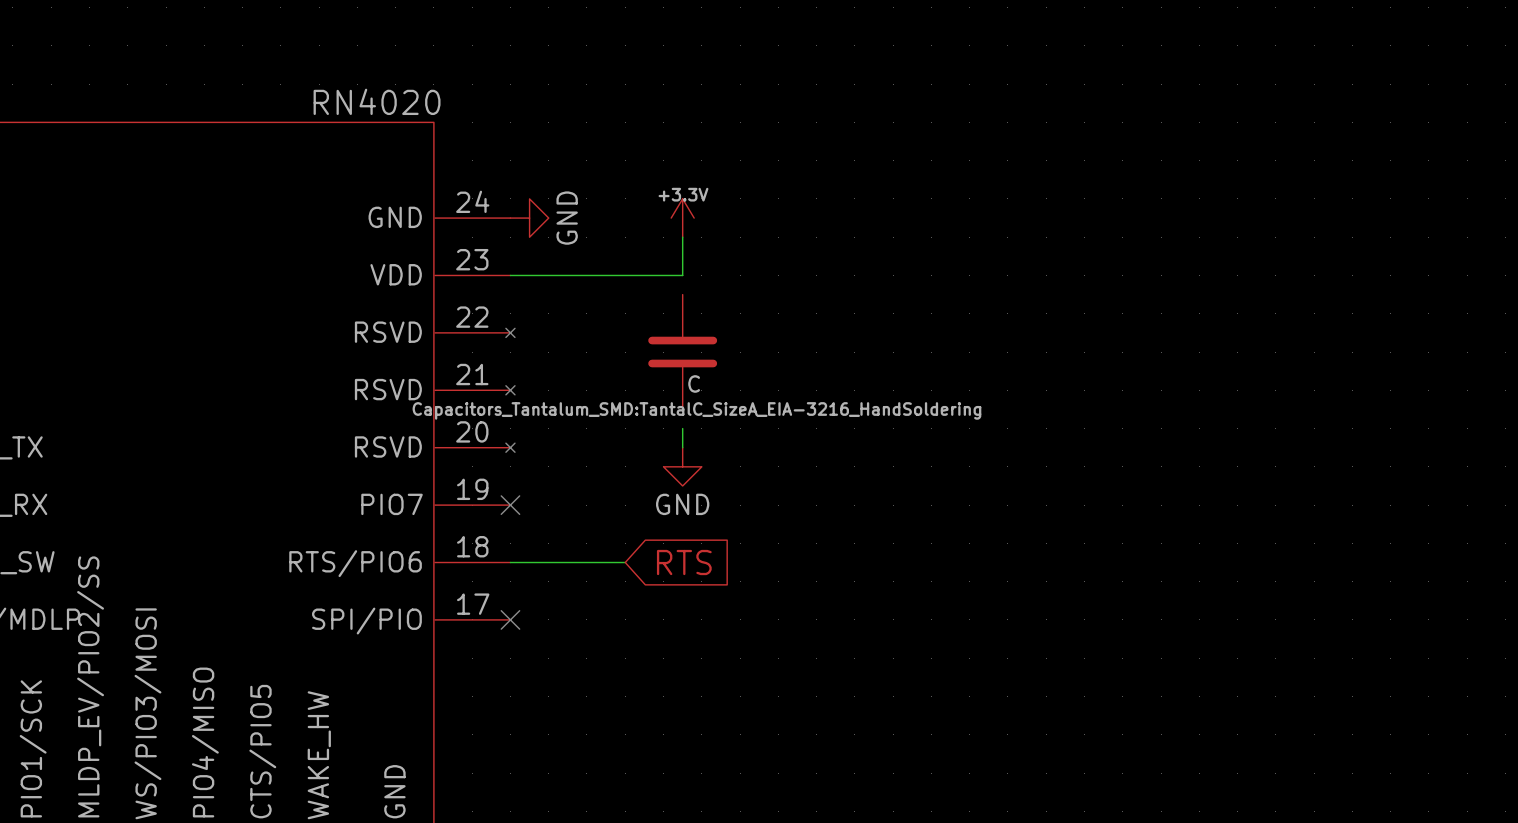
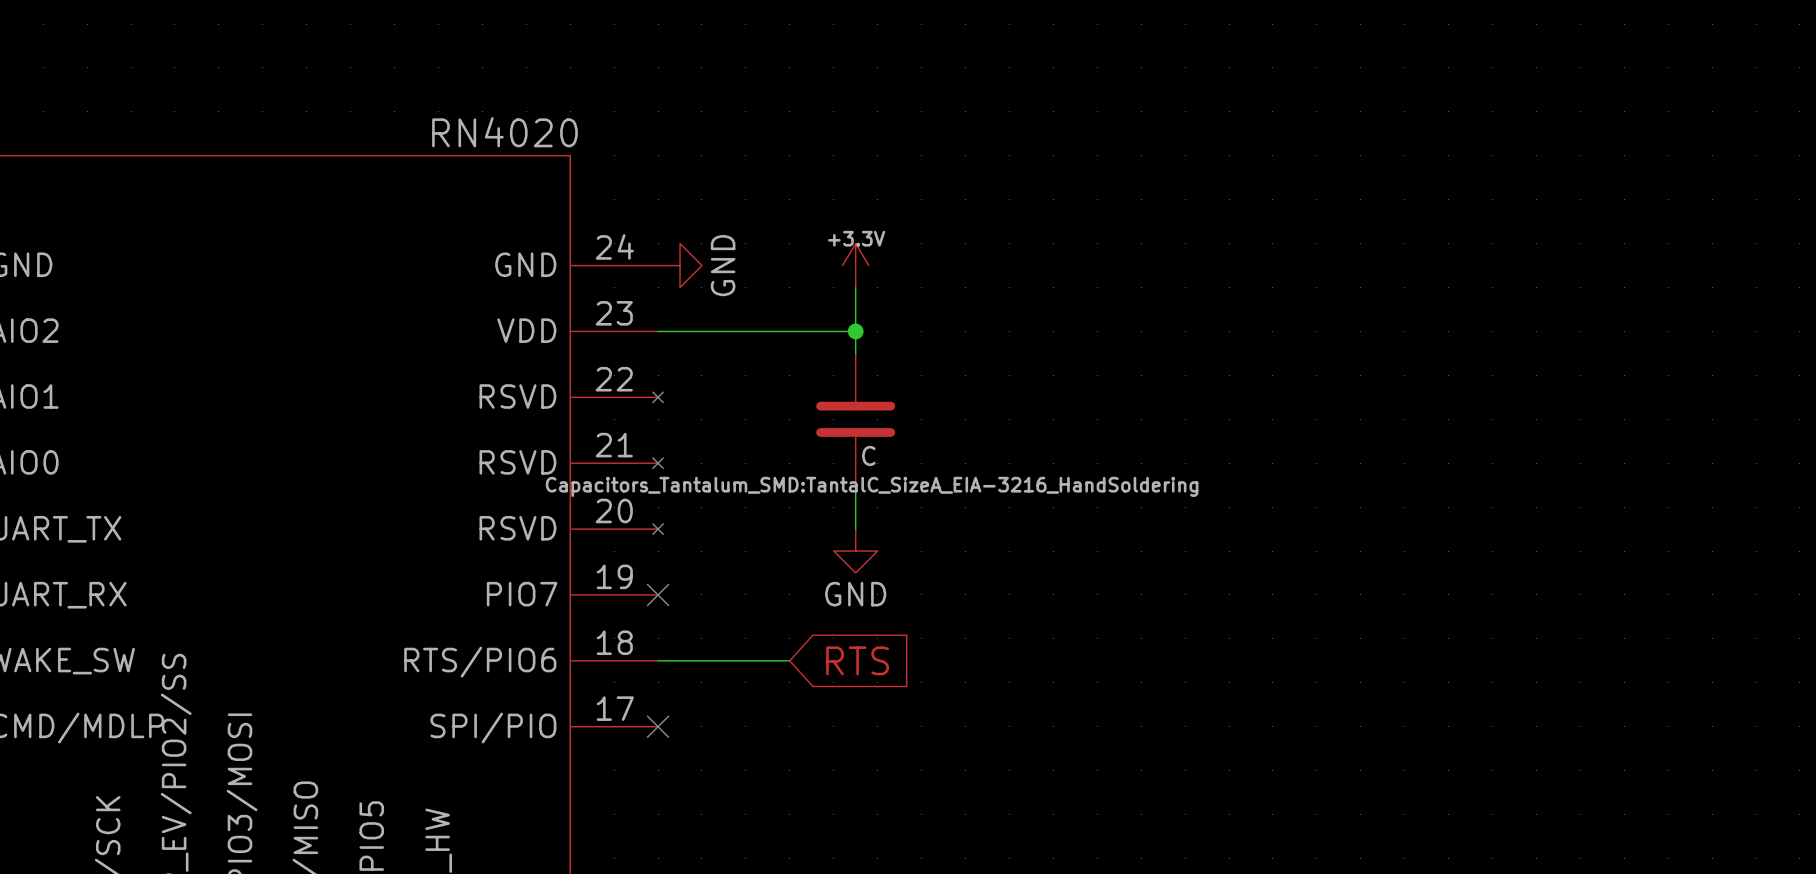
wire: none -> (855, 331) (855, 353)
junction: none -> (855, 331)
wire: none -> (855, 485) (855, 507)

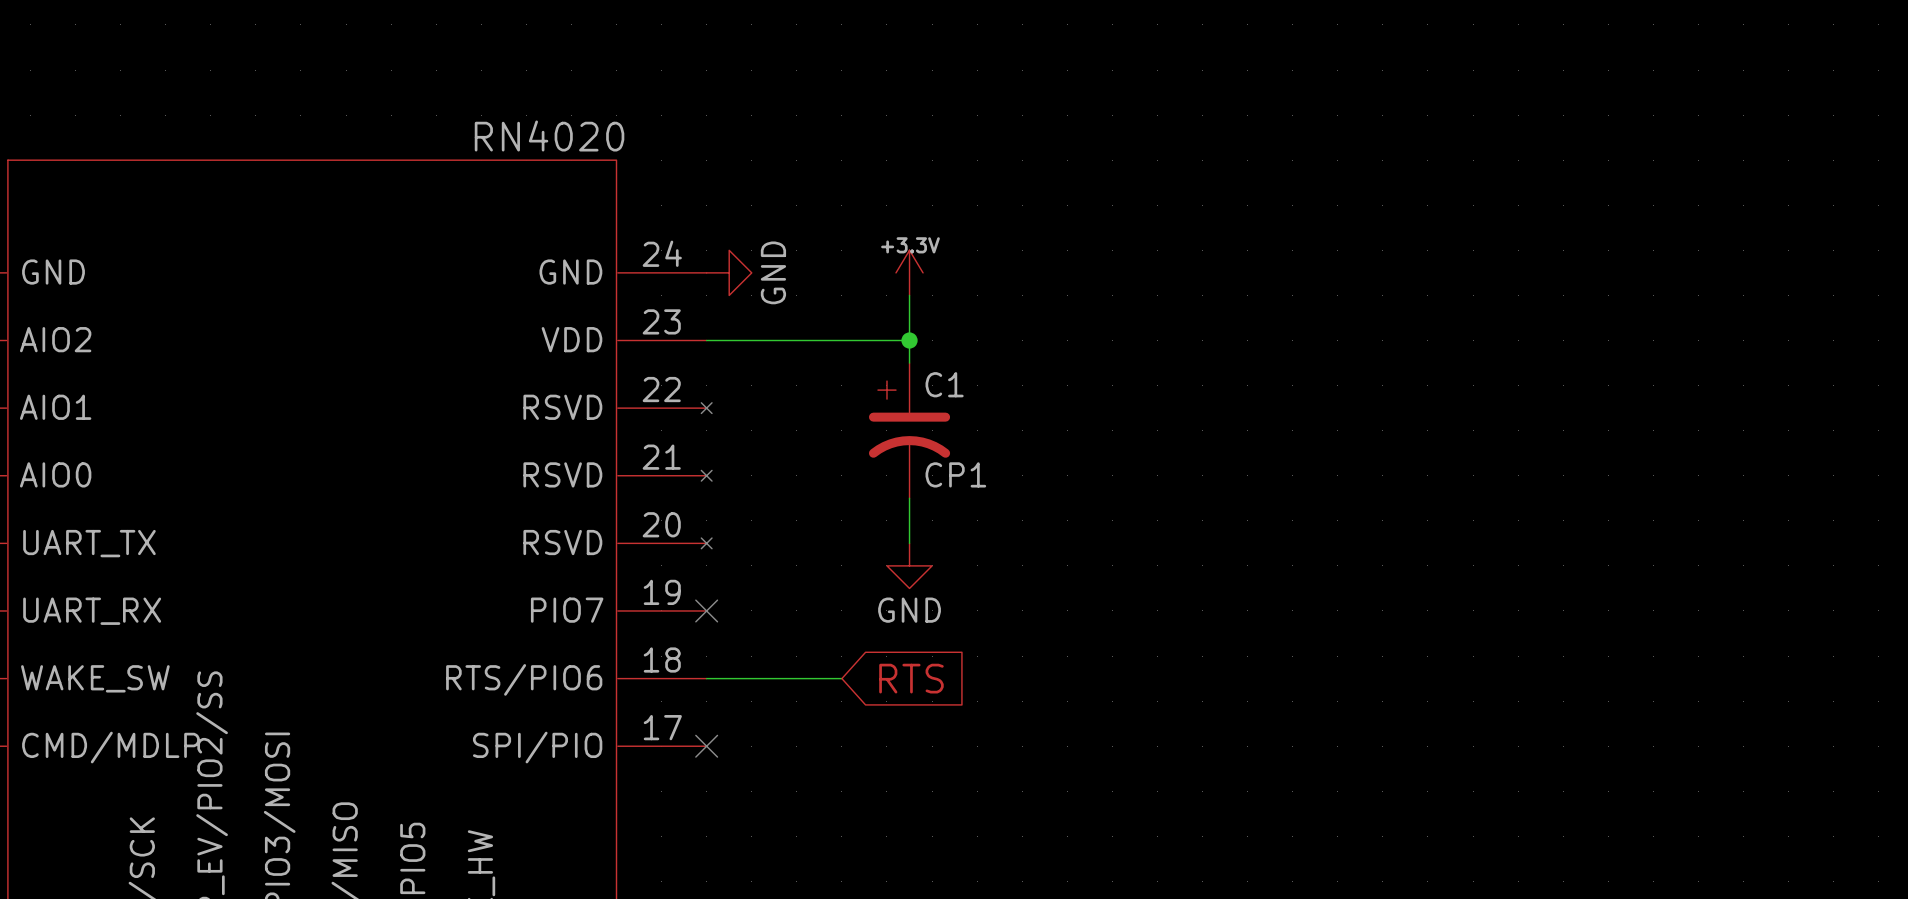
part: C (855, 419) -> none
C1: none -> CP1 (909, 430)

